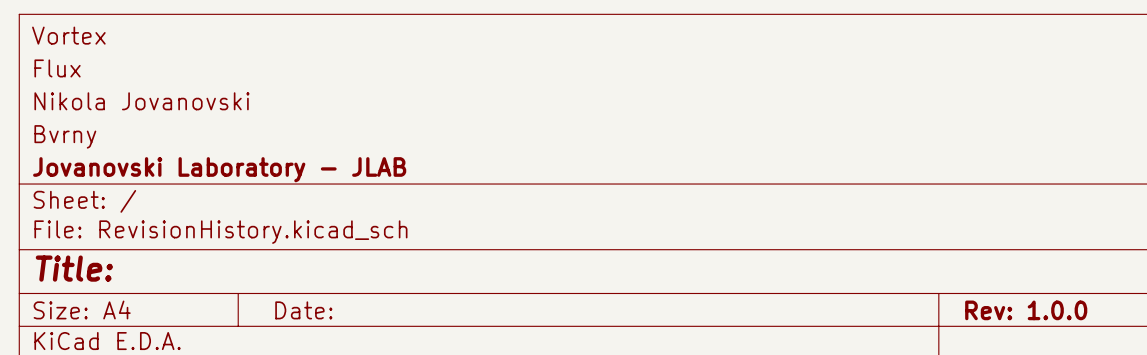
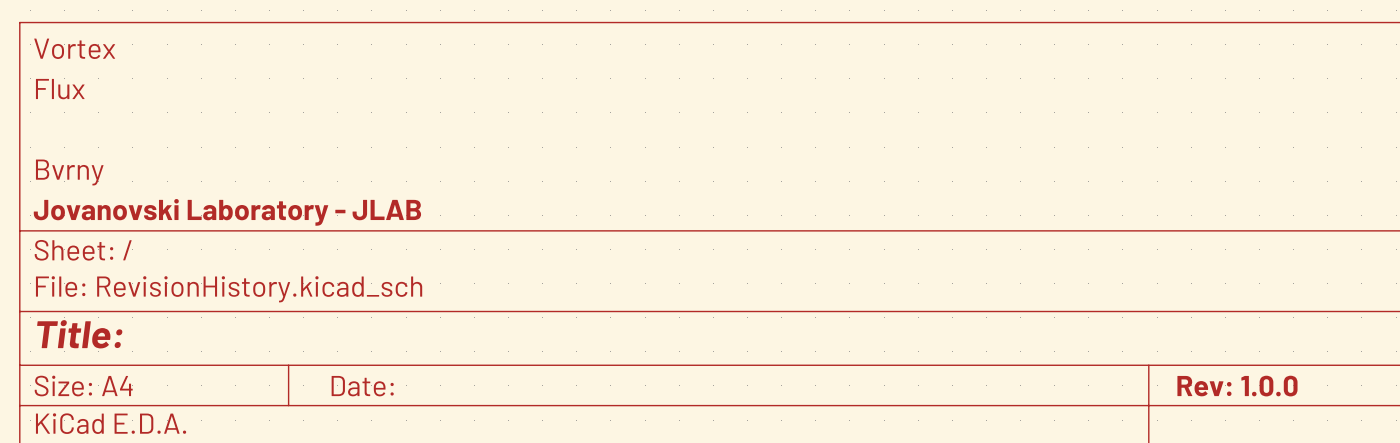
title block: Nikola Jovanovski (141, 101) -> none

